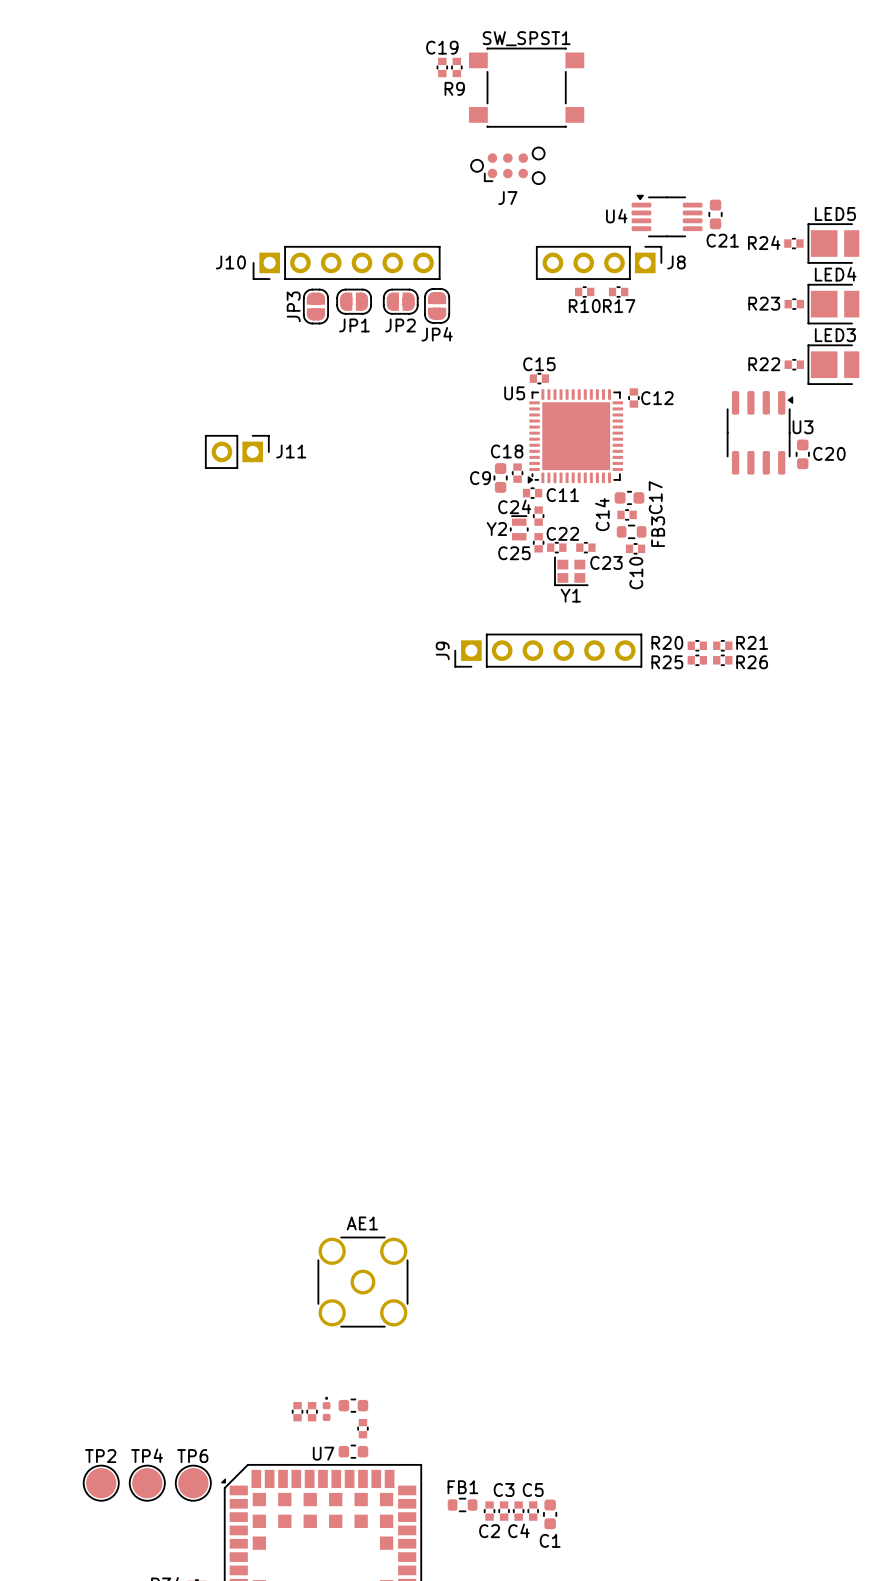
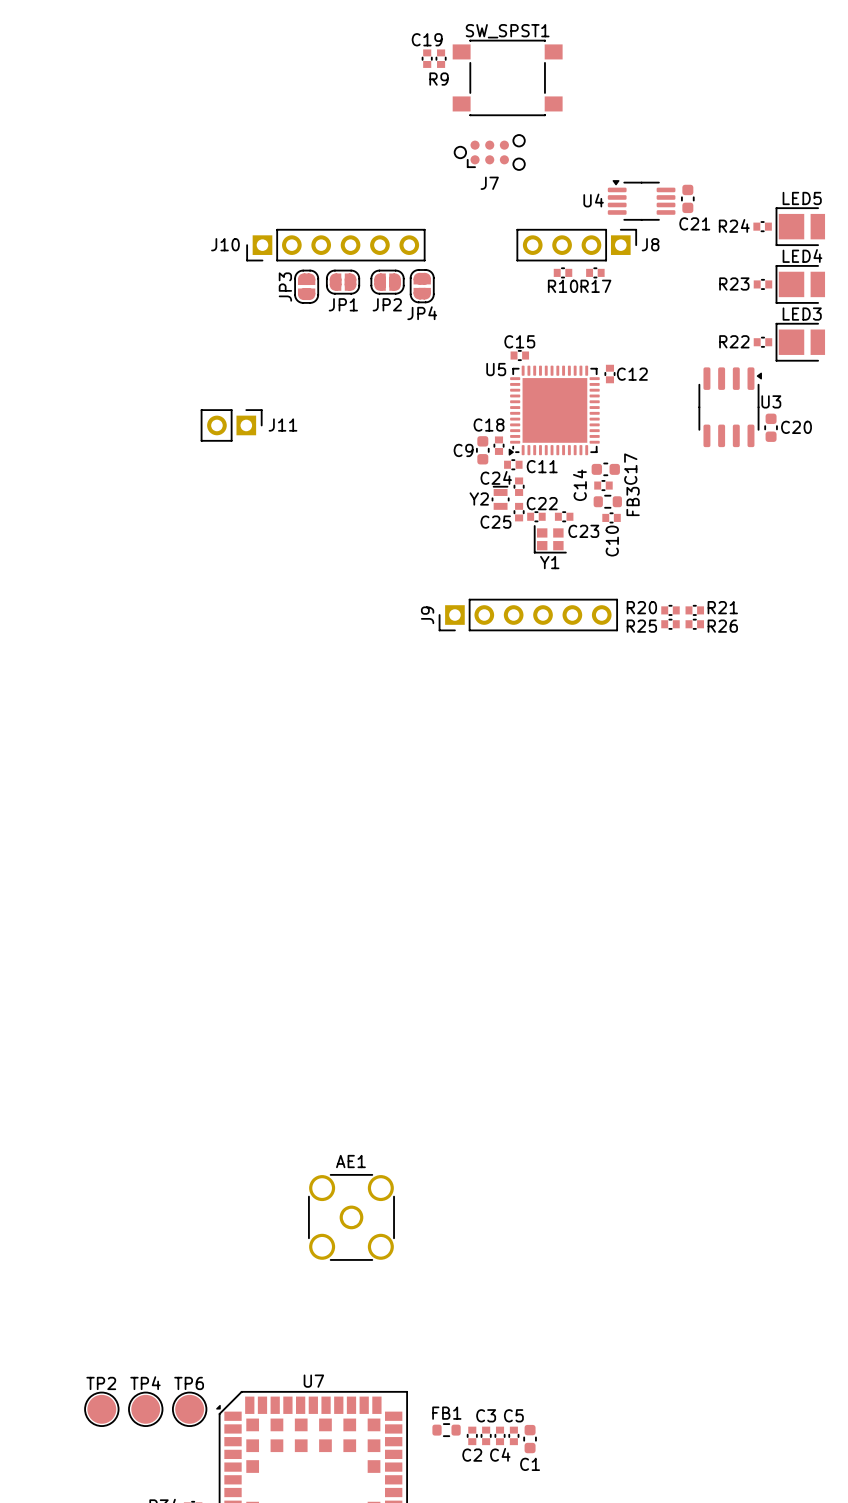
part: (353, 1405) -> none
part: (326, 1409) -> none
part: (297, 1411) -> none
part: (312, 1411) -> none
part: (362, 1428) -> none
part: (353, 1451) -> none

